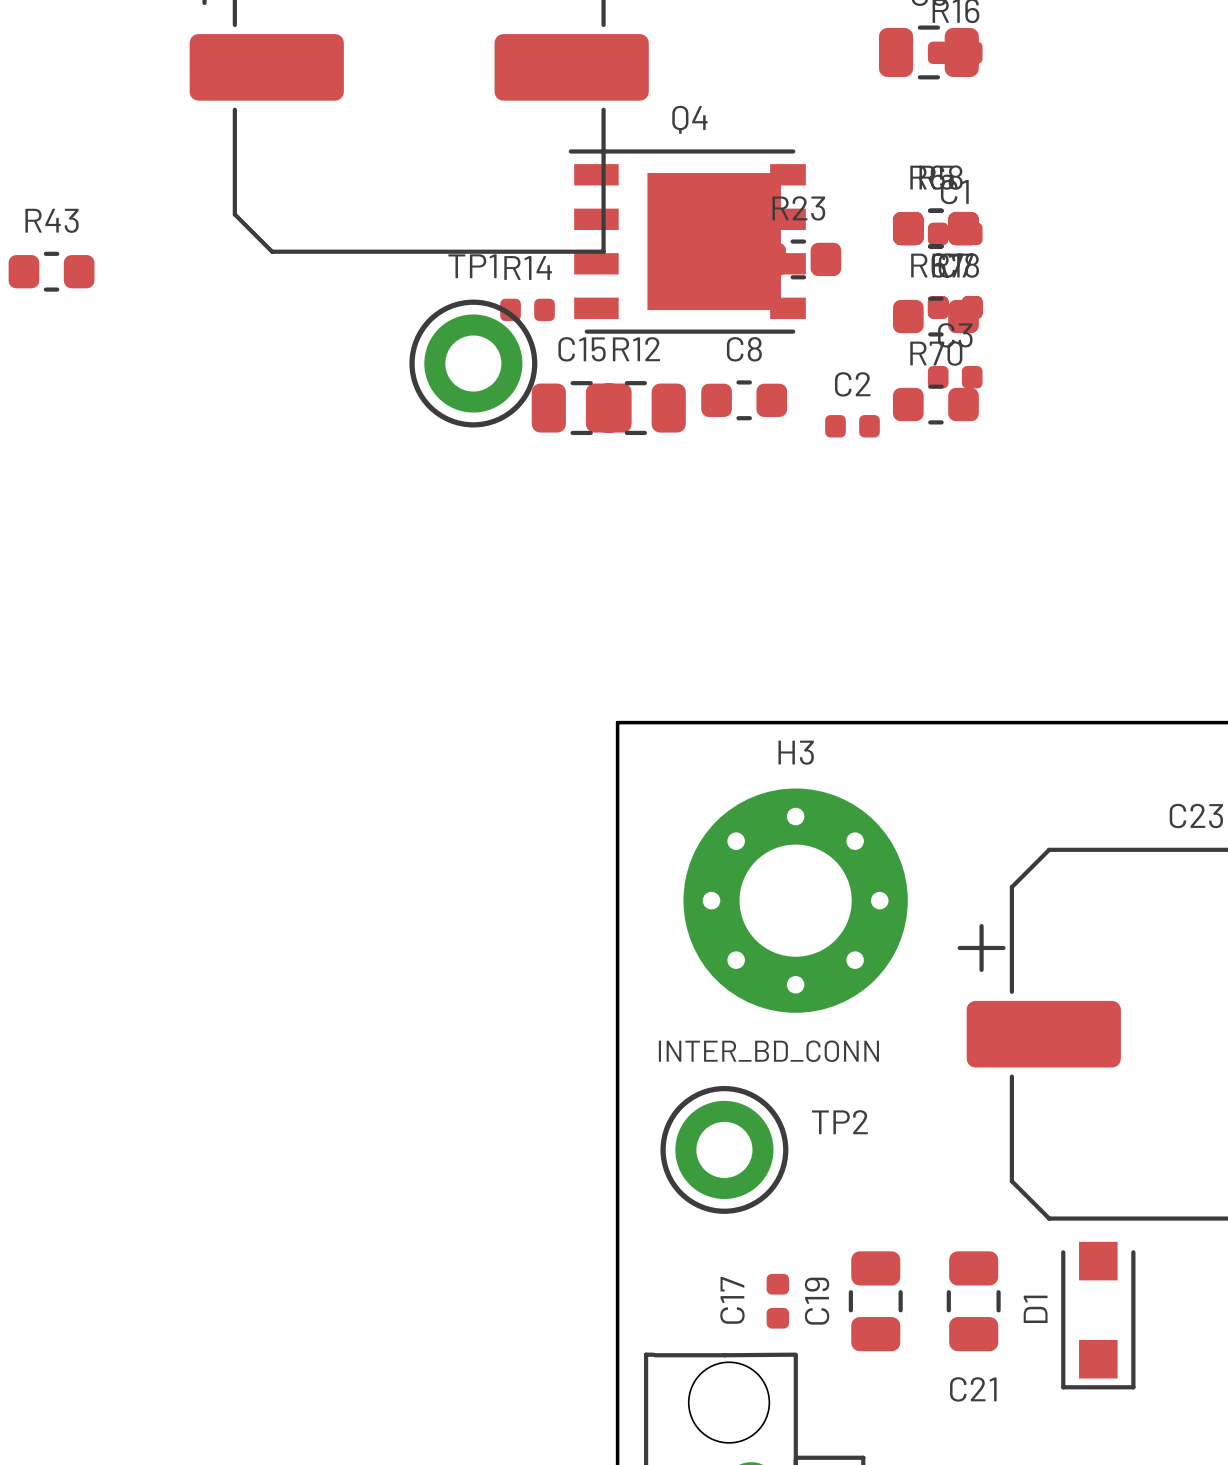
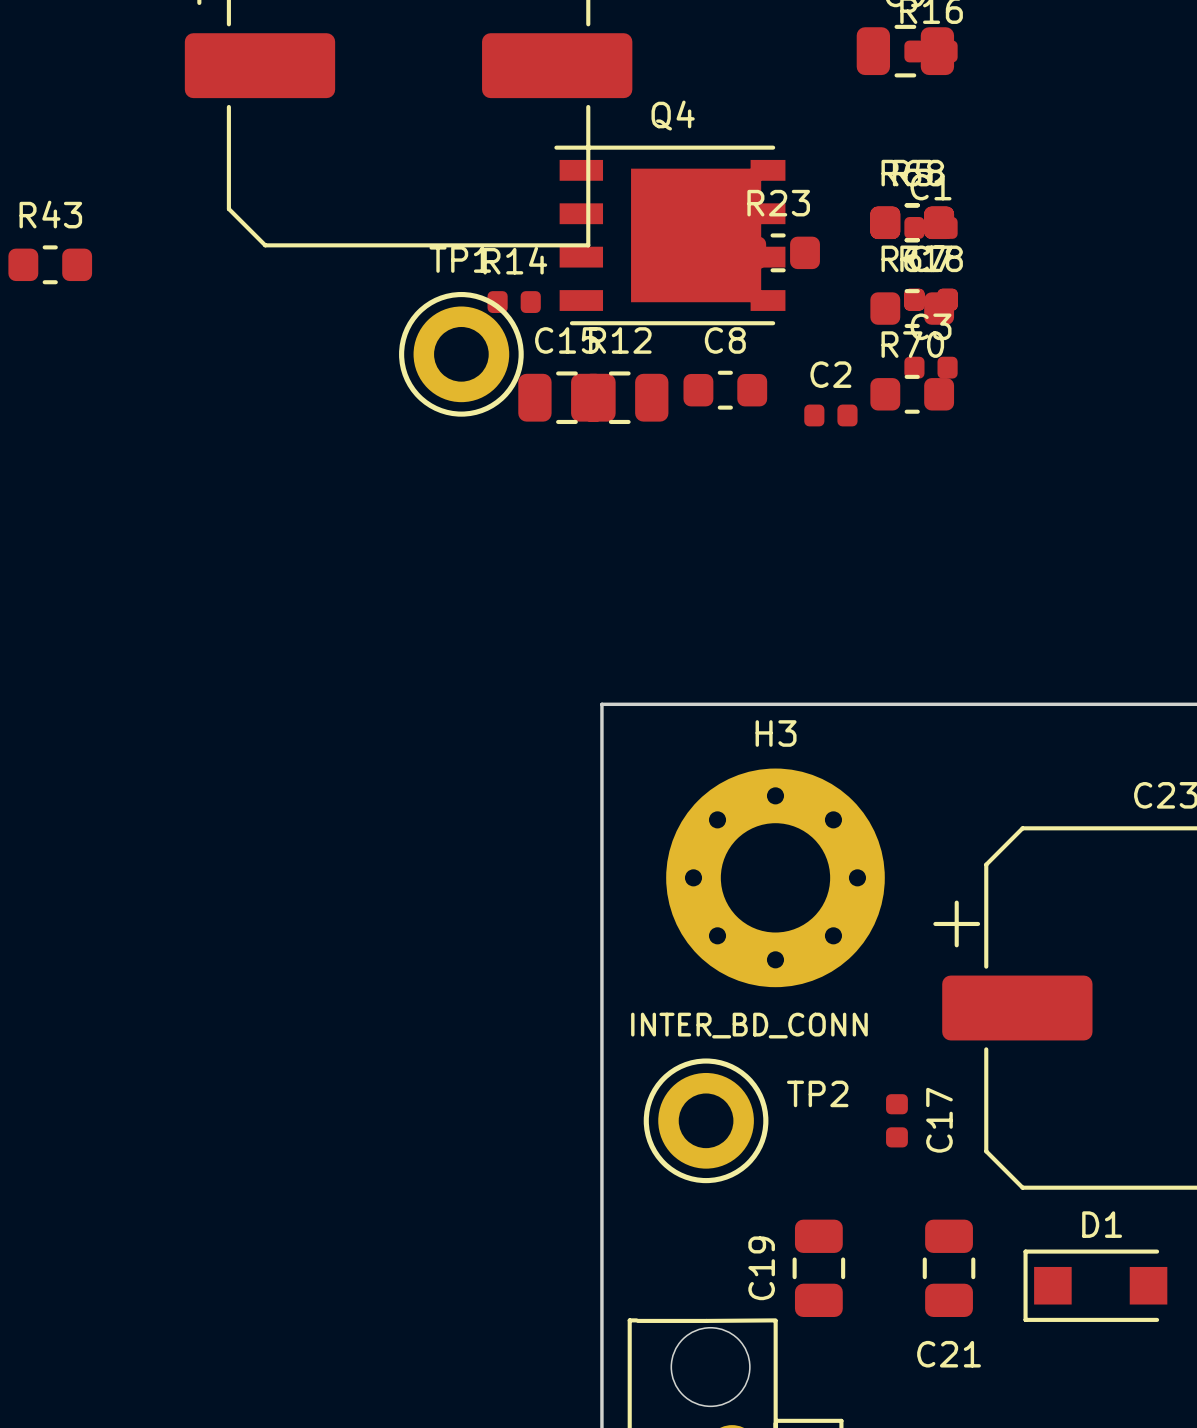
C17 name position: C17 (732, 1300) -> C17 (939, 1120)
C17 position: (777, 1301) -> (896, 1120)
C19 position: (875, 1301) -> (818, 1268)
D1 rotation: 0° (1098, 1315) -> 90° clockwise (1095, 1285)

